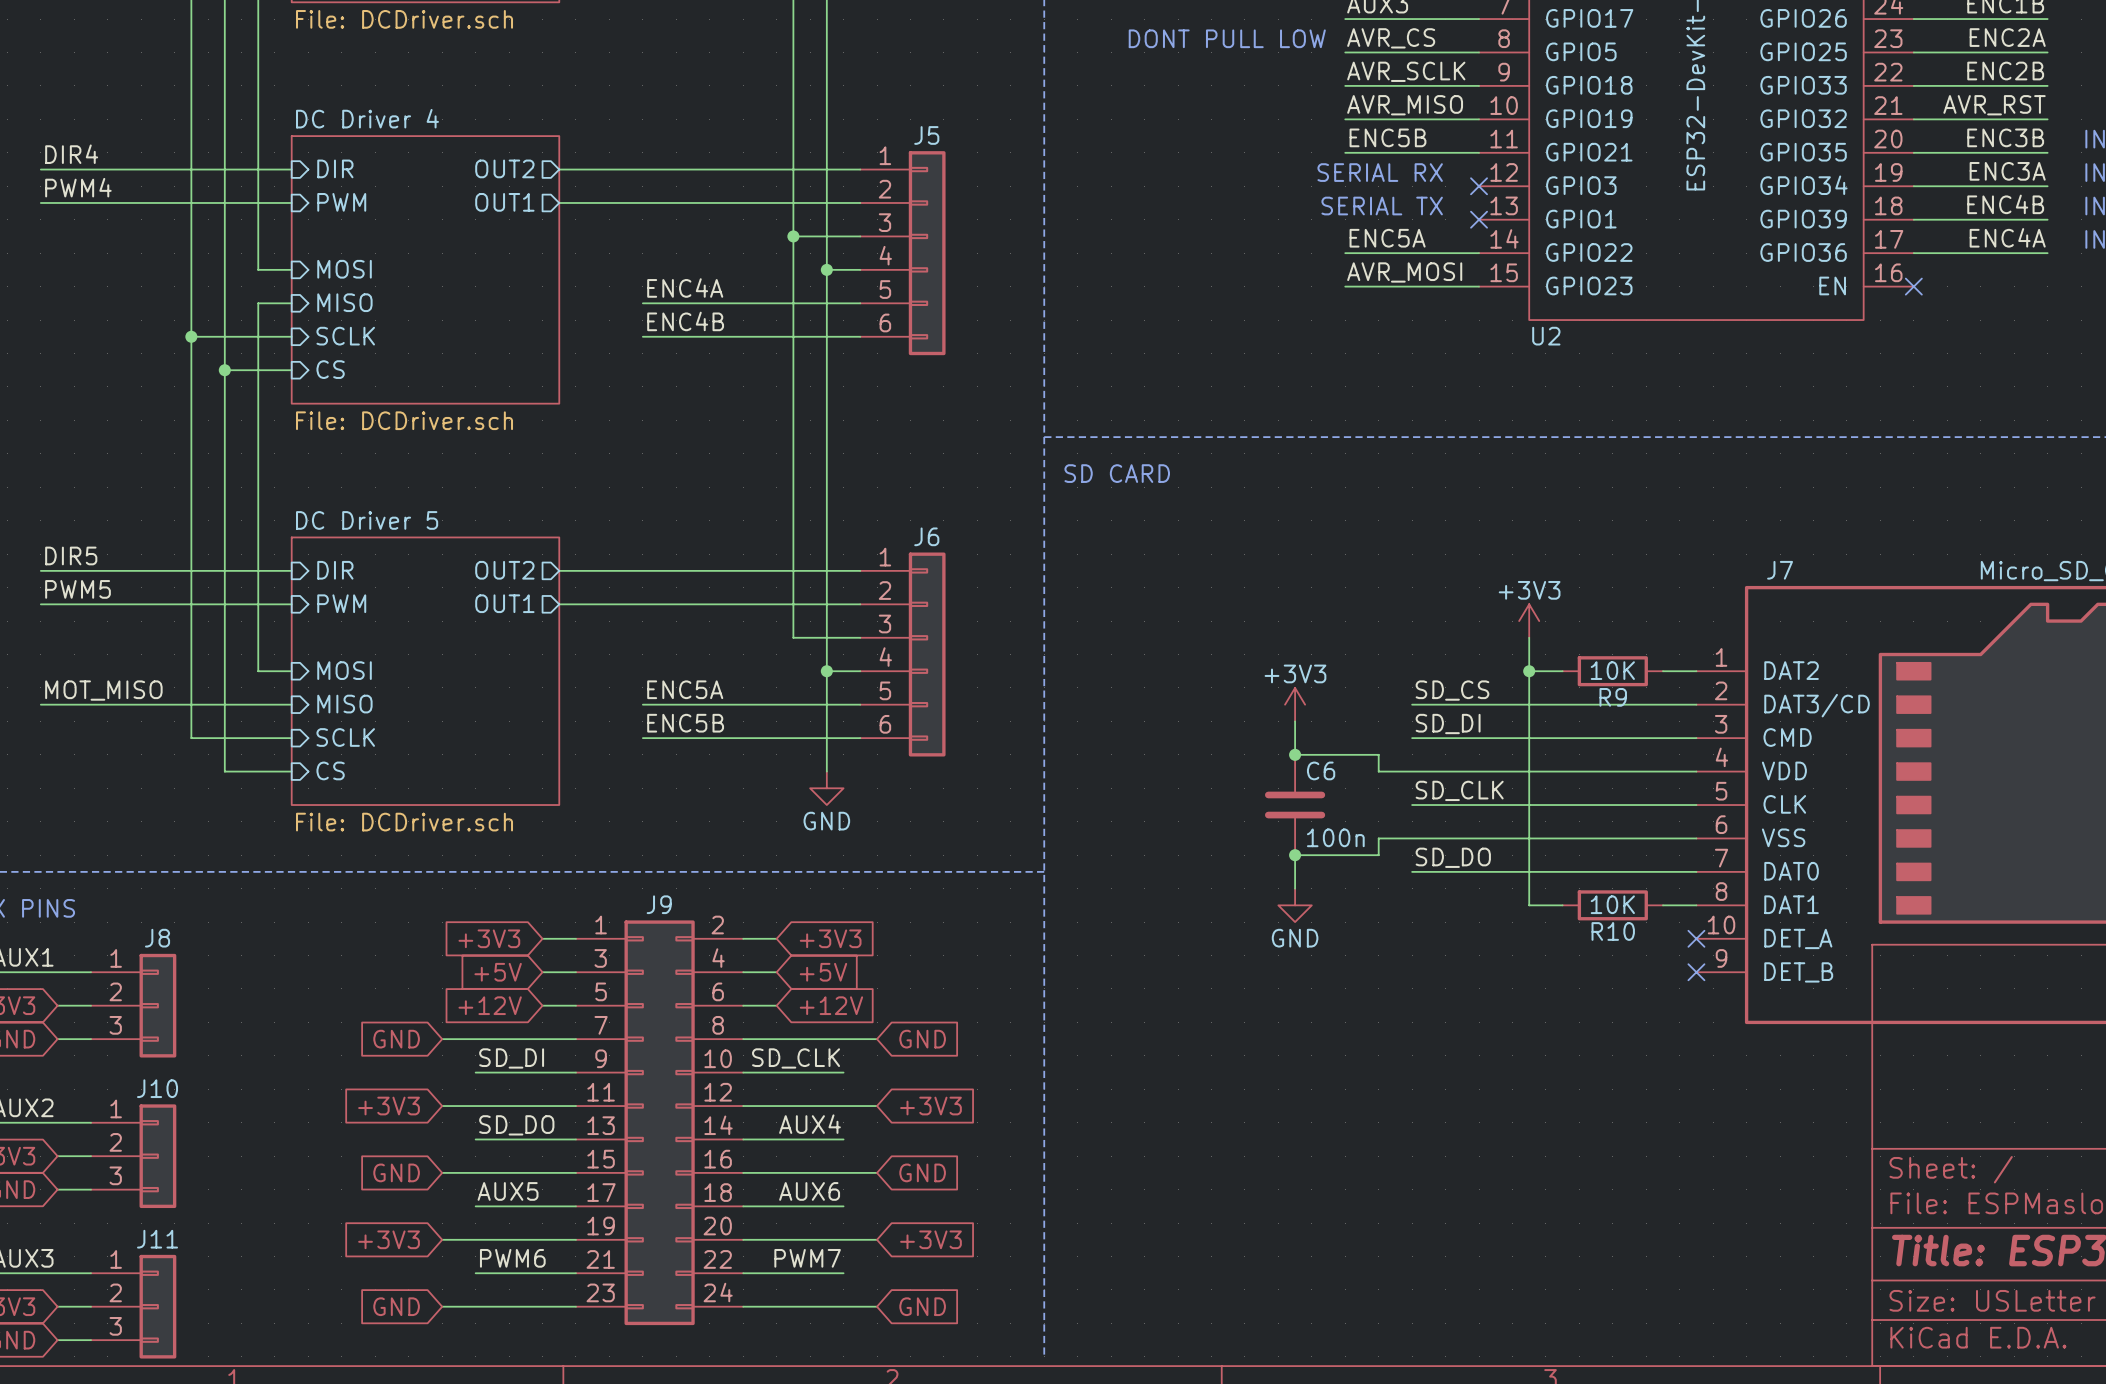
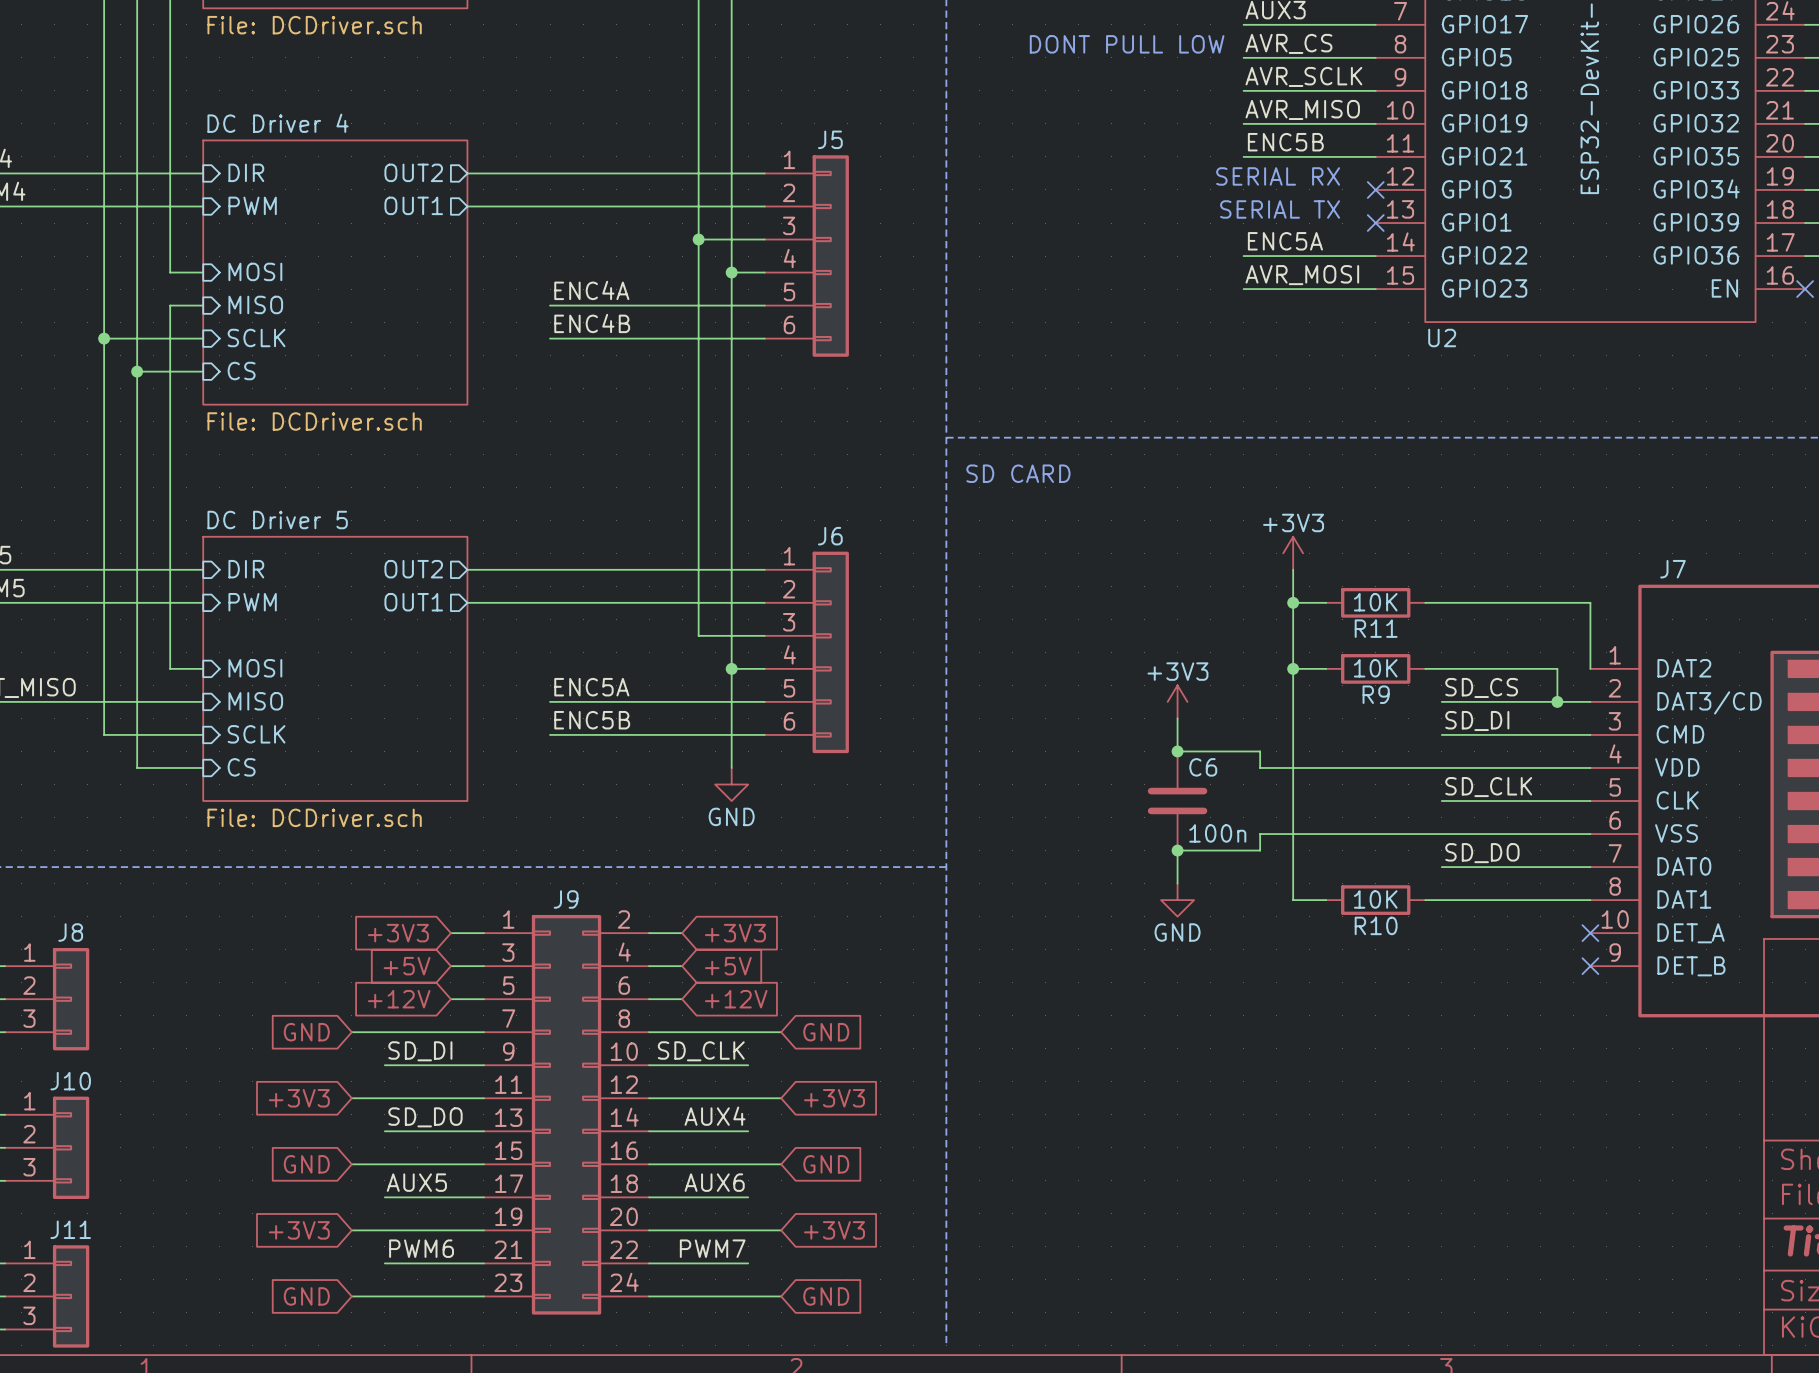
power symbol: none -> +3V3 (1293, 553)
wire: none -> (1293, 569) (1293, 900) (1326, 900)
wire: none -> (1293, 602) (1326, 602)
junction: none -> (1293, 602)
R11: none -> 10K (1375, 602)
power symbol: +3V3 (1529, 621) -> none
wire: (1529, 637) (1529, 905) -> none
wire: none -> (1293, 668) (1326, 668)
junction: none -> (1293, 668)
junction: (1529, 671) -> none
wire: none -> (1458, 668) (1557, 668) (1557, 701)
R9 position: (1612, 671) -> (1375, 668)
wire: (1662, 671) (1696, 671) -> (1425, 602) (1590, 602) (1590, 668)
label position: SD_CS (1452, 690) -> SD_CS (1481, 687)
power symbol position: +3V3 (1295, 704) -> +3V3 (1177, 701)
wire: (1412, 704) (1545, 704) -> none
junction: none -> (1557, 701)
wire: (1295, 721) (1295, 754) -> (1177, 718) (1177, 751) (1194, 751)
label position: SD_DI (1448, 723) -> SD_DI (1477, 721)
wire: (1412, 738) (1545, 738) -> none
junction position: (1295, 754) -> (1177, 751)
wire: (1361, 754) (1378, 754) (1378, 771) -> (1260, 751) (1260, 767) (1276, 767)
label position: SD_CLK (1459, 790) -> SD_CLK (1488, 787)
C6 position: (1295, 805) -> (1177, 801)
wire: (1412, 805) (1545, 805) -> none
wire: (1378, 838) (1378, 855) (1361, 855) -> (1276, 834) (1260, 834) (1260, 850)
wire: (1295, 855) (1295, 888) -> (1194, 850) (1177, 850) (1177, 883)
junction position: (1295, 855) -> (1177, 850)
label position: SD_DO (1453, 857) -> SD_DO (1482, 853)
wire: (1412, 871) (1545, 871) -> none
power symbol position: GND (1295, 905) -> GND (1177, 900)
wire: none -> (1458, 900) (1557, 900)
R10 position: (1612, 905) -> (1375, 900)

